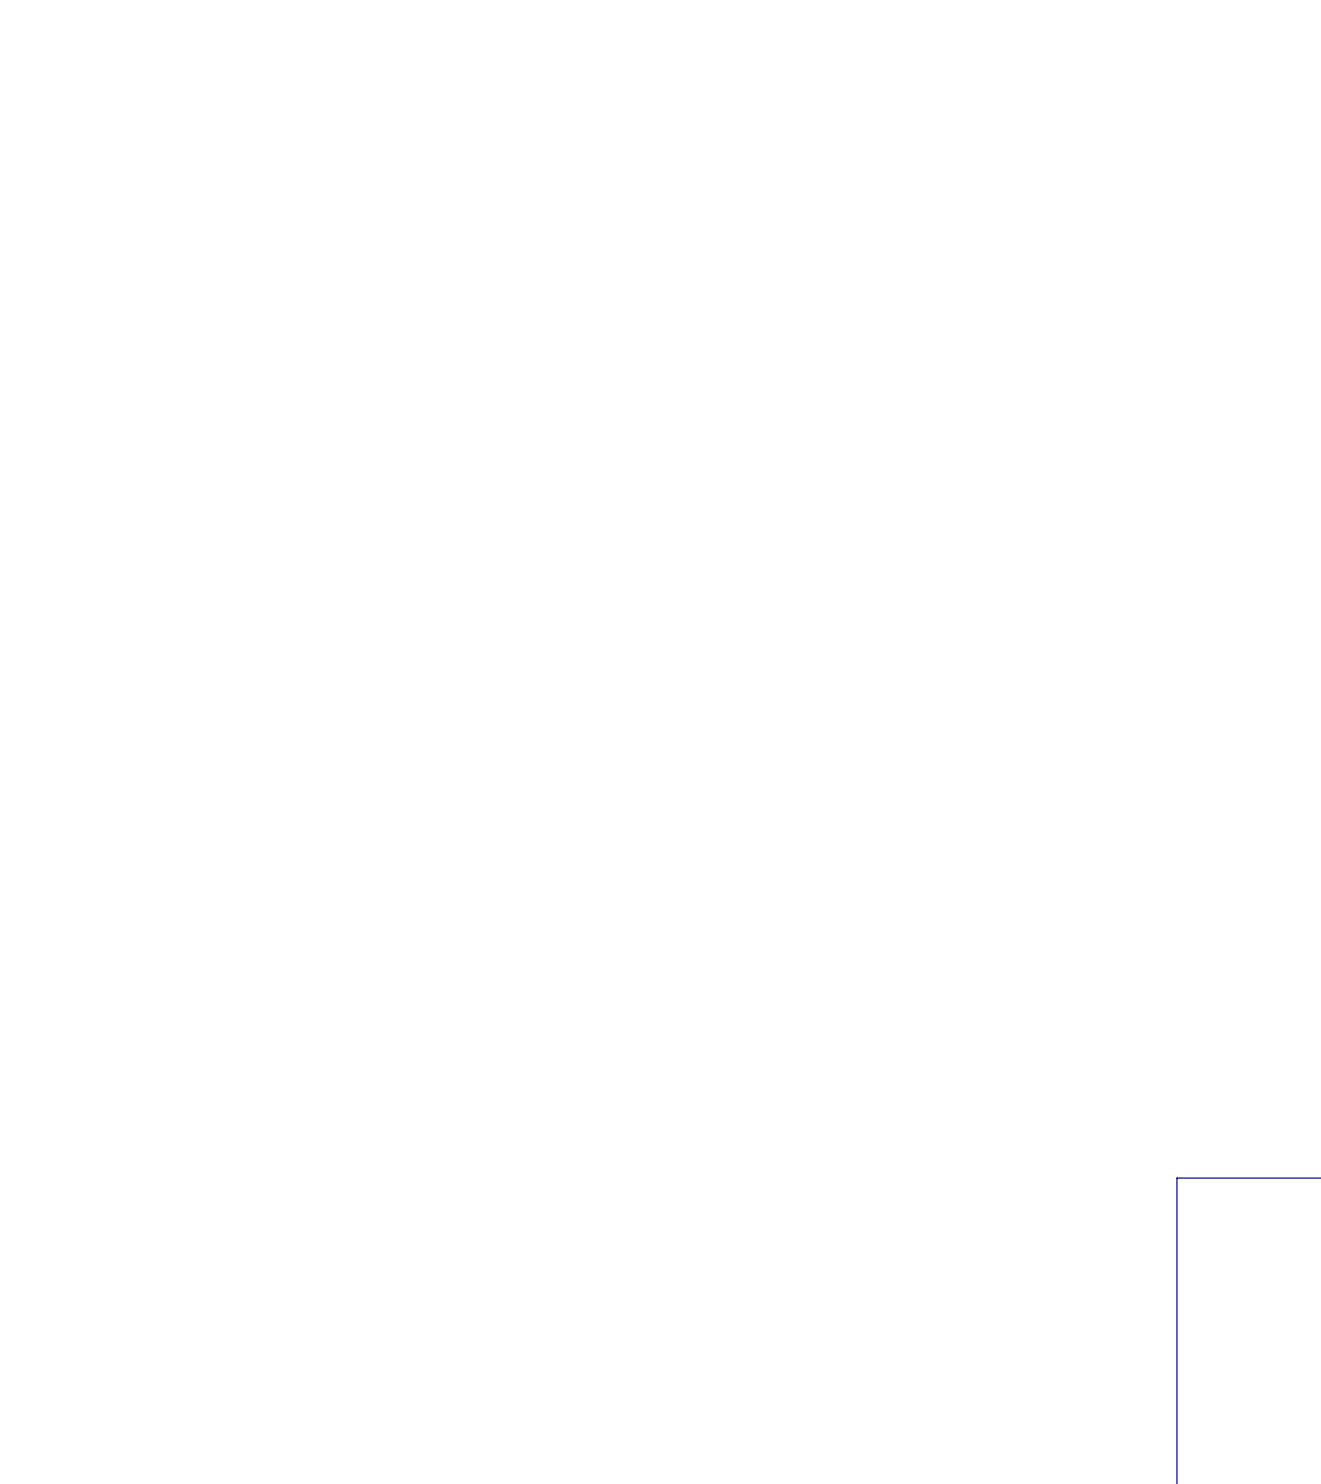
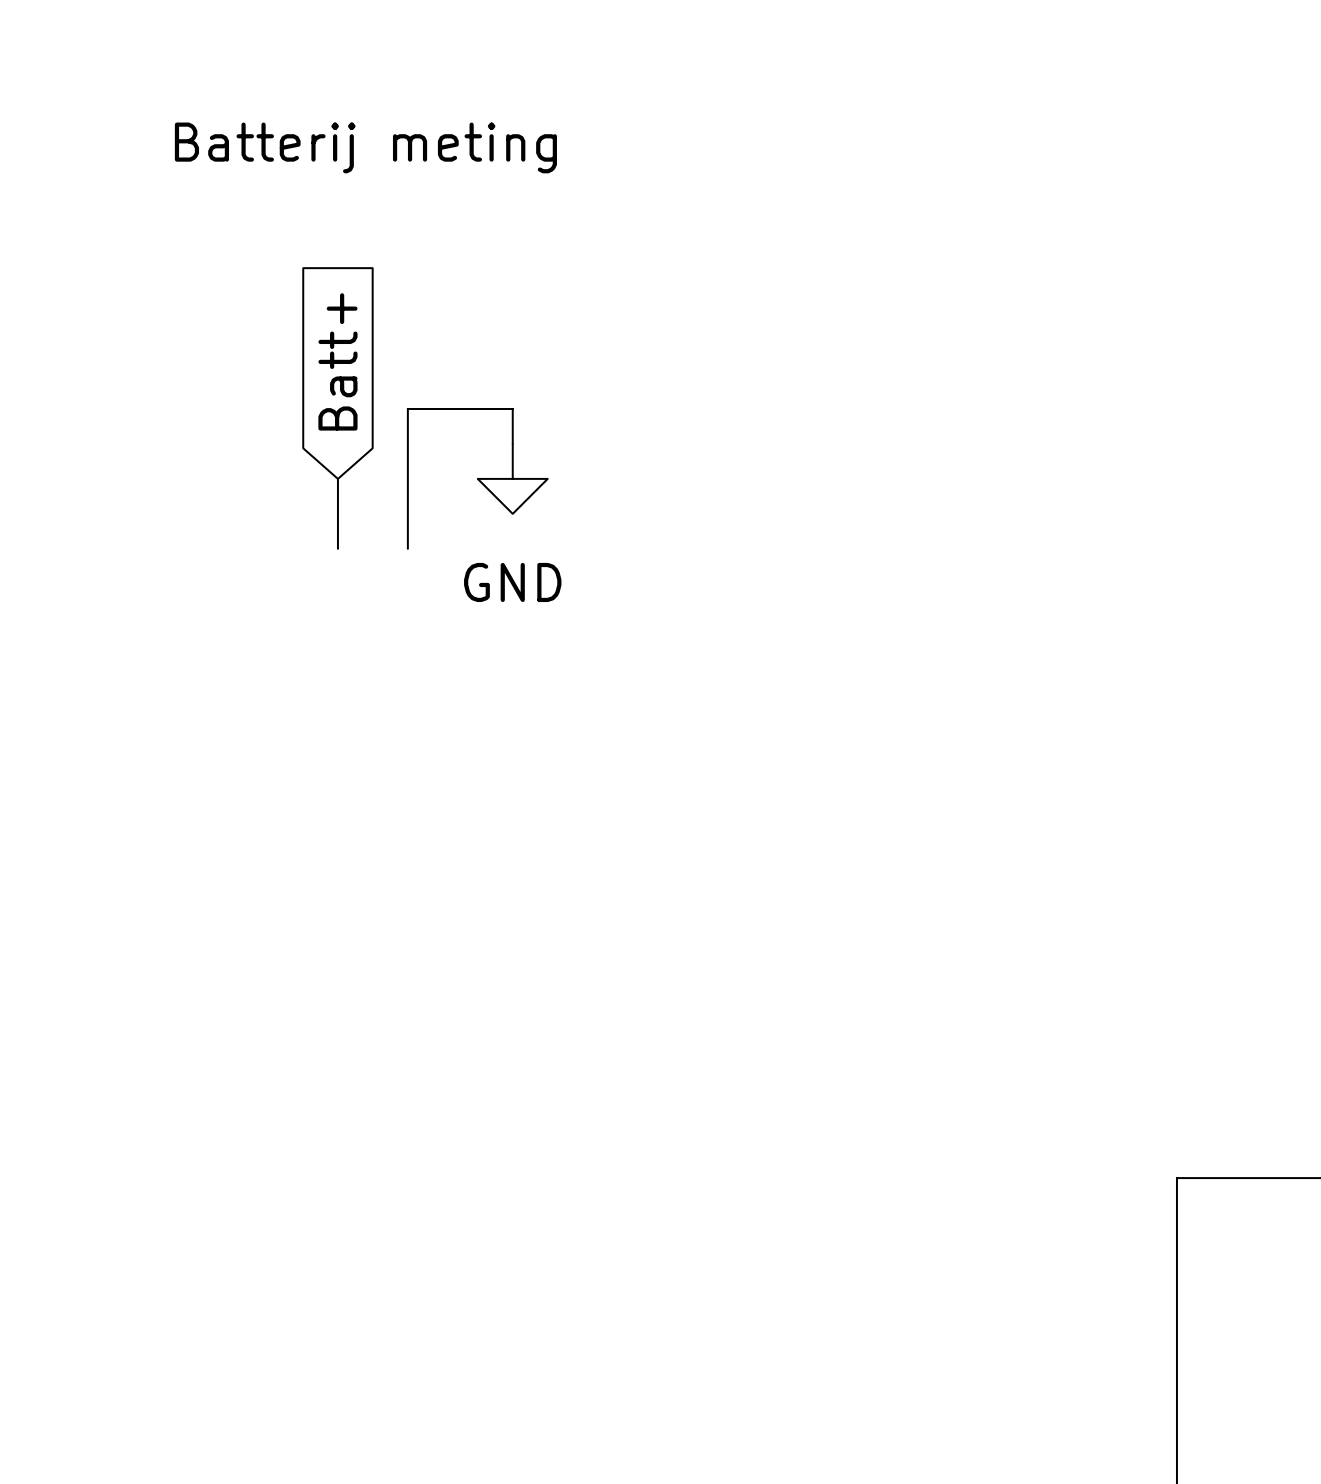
text: none -> Batterij meting (365, 147)
global label: none -> Batt+ (337, 361)
wire: none -> (512, 443) (512, 408) (407, 408) (407, 548)
wire: none -> (337, 478) (337, 548)
power symbol: none -> GND (512, 478)

